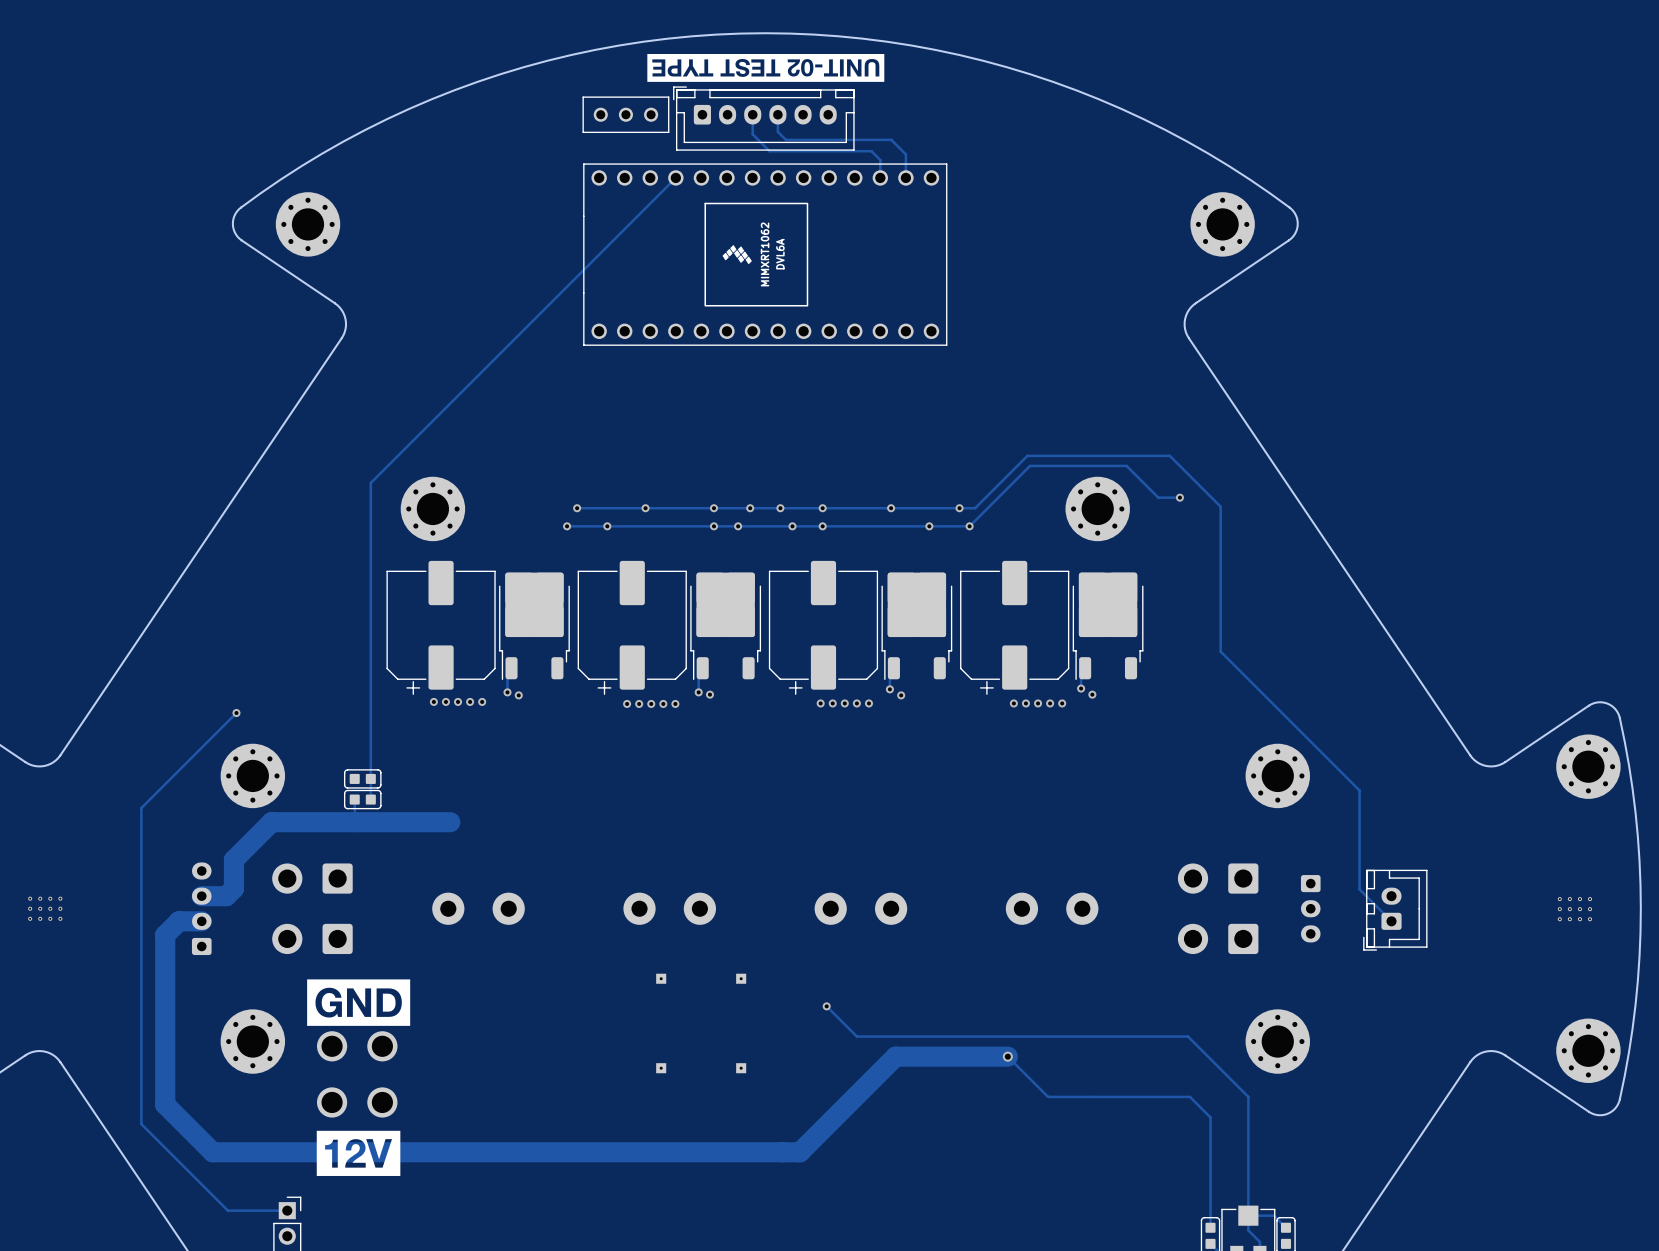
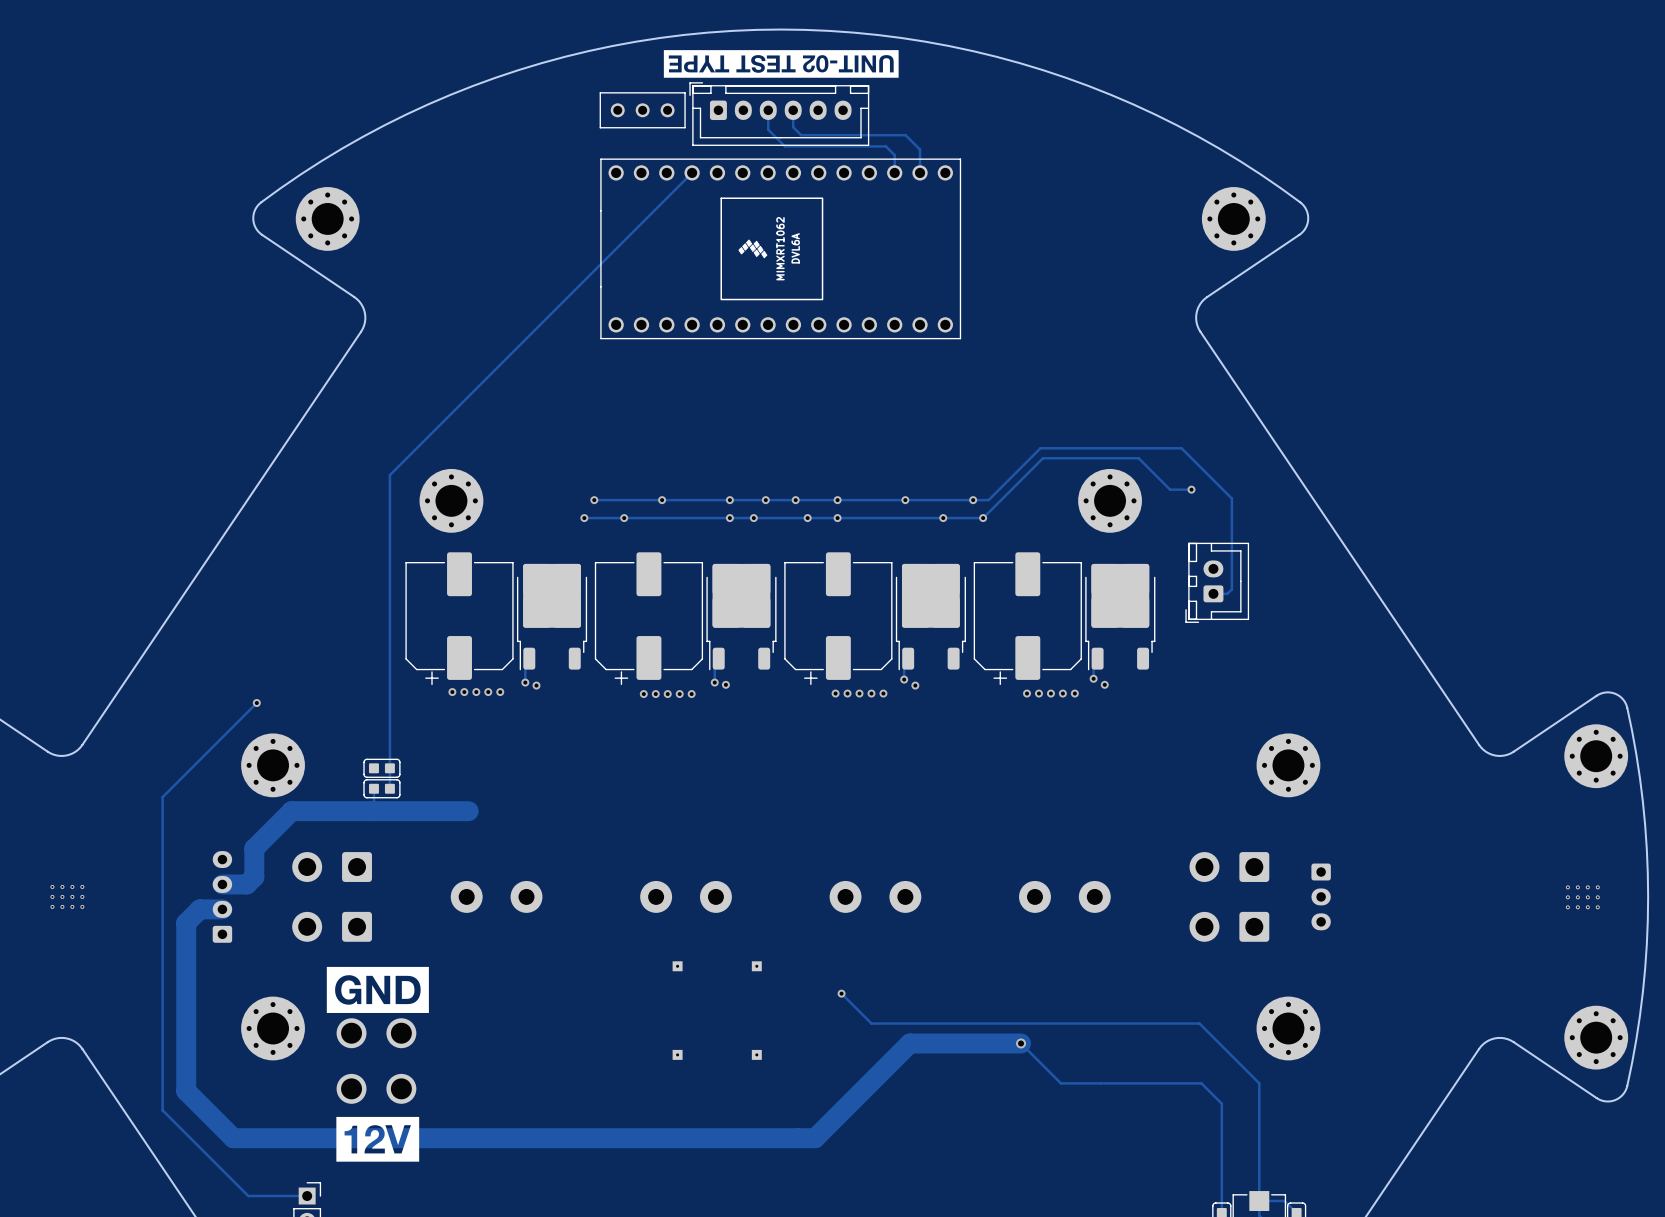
part: none -> (1217, 582)
track: (1220, 598) (1220, 651) (1359, 790) (1359, 889) (1391, 921) -> (1231, 589) (1227, 593) (1213, 593)
part: (1395, 910) -> none

